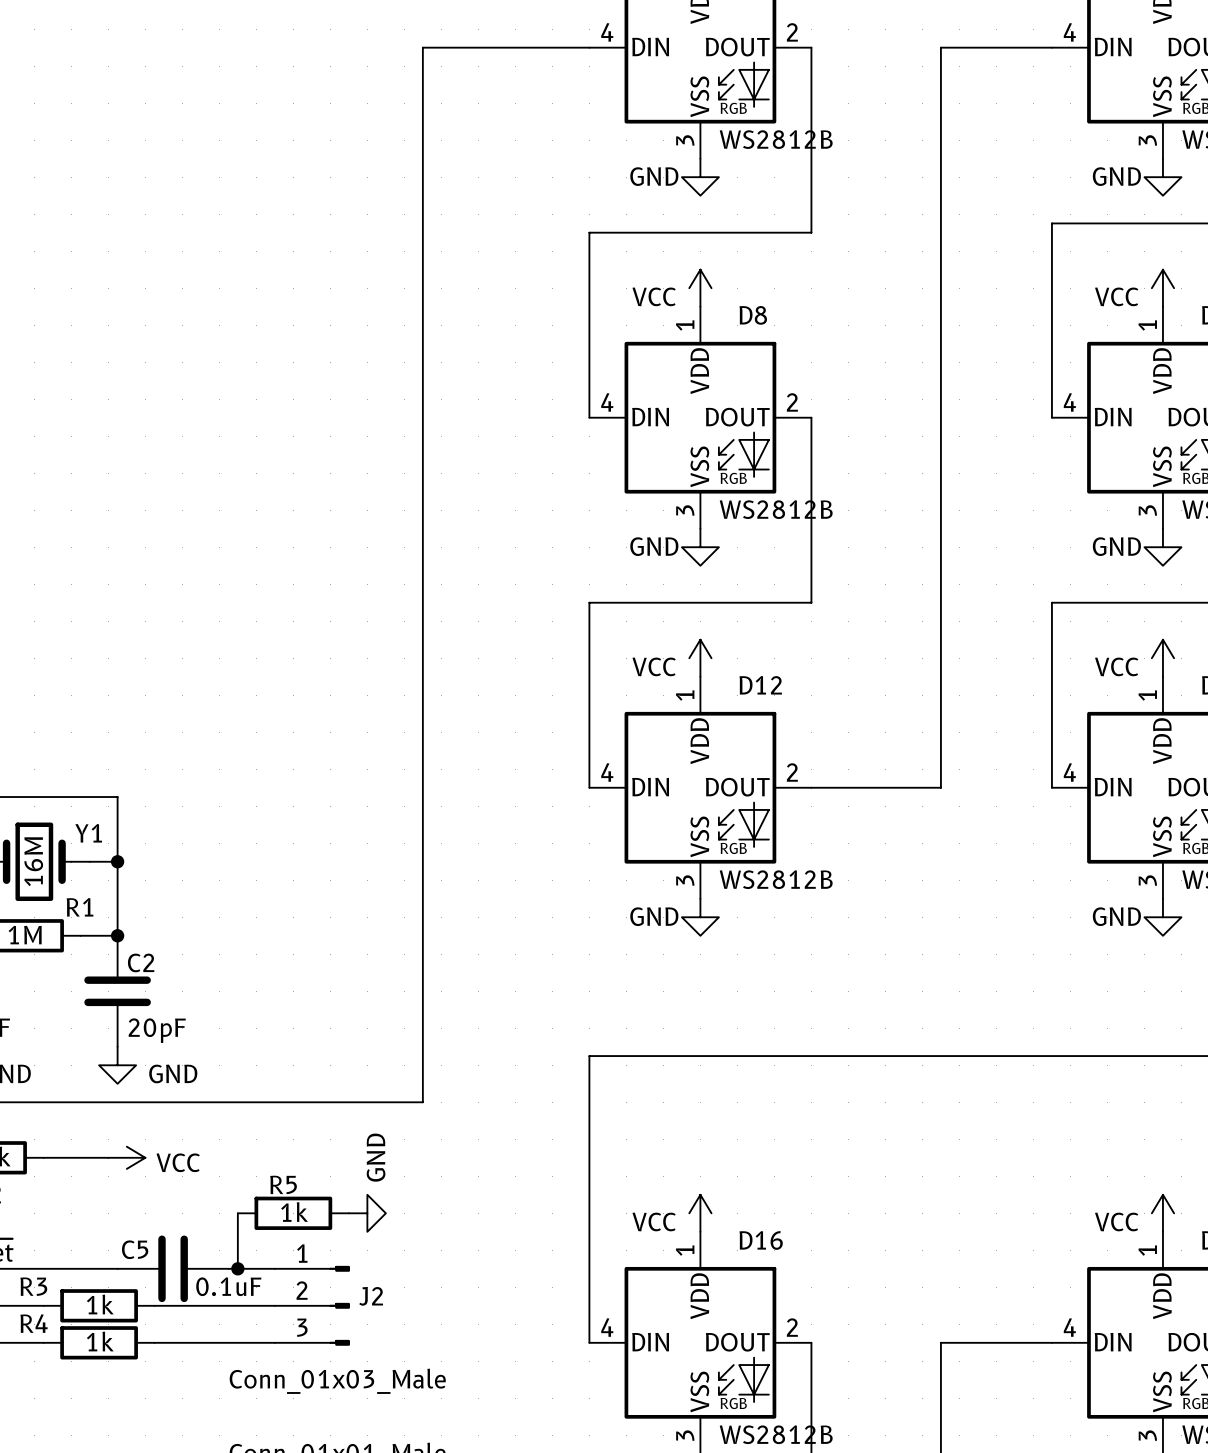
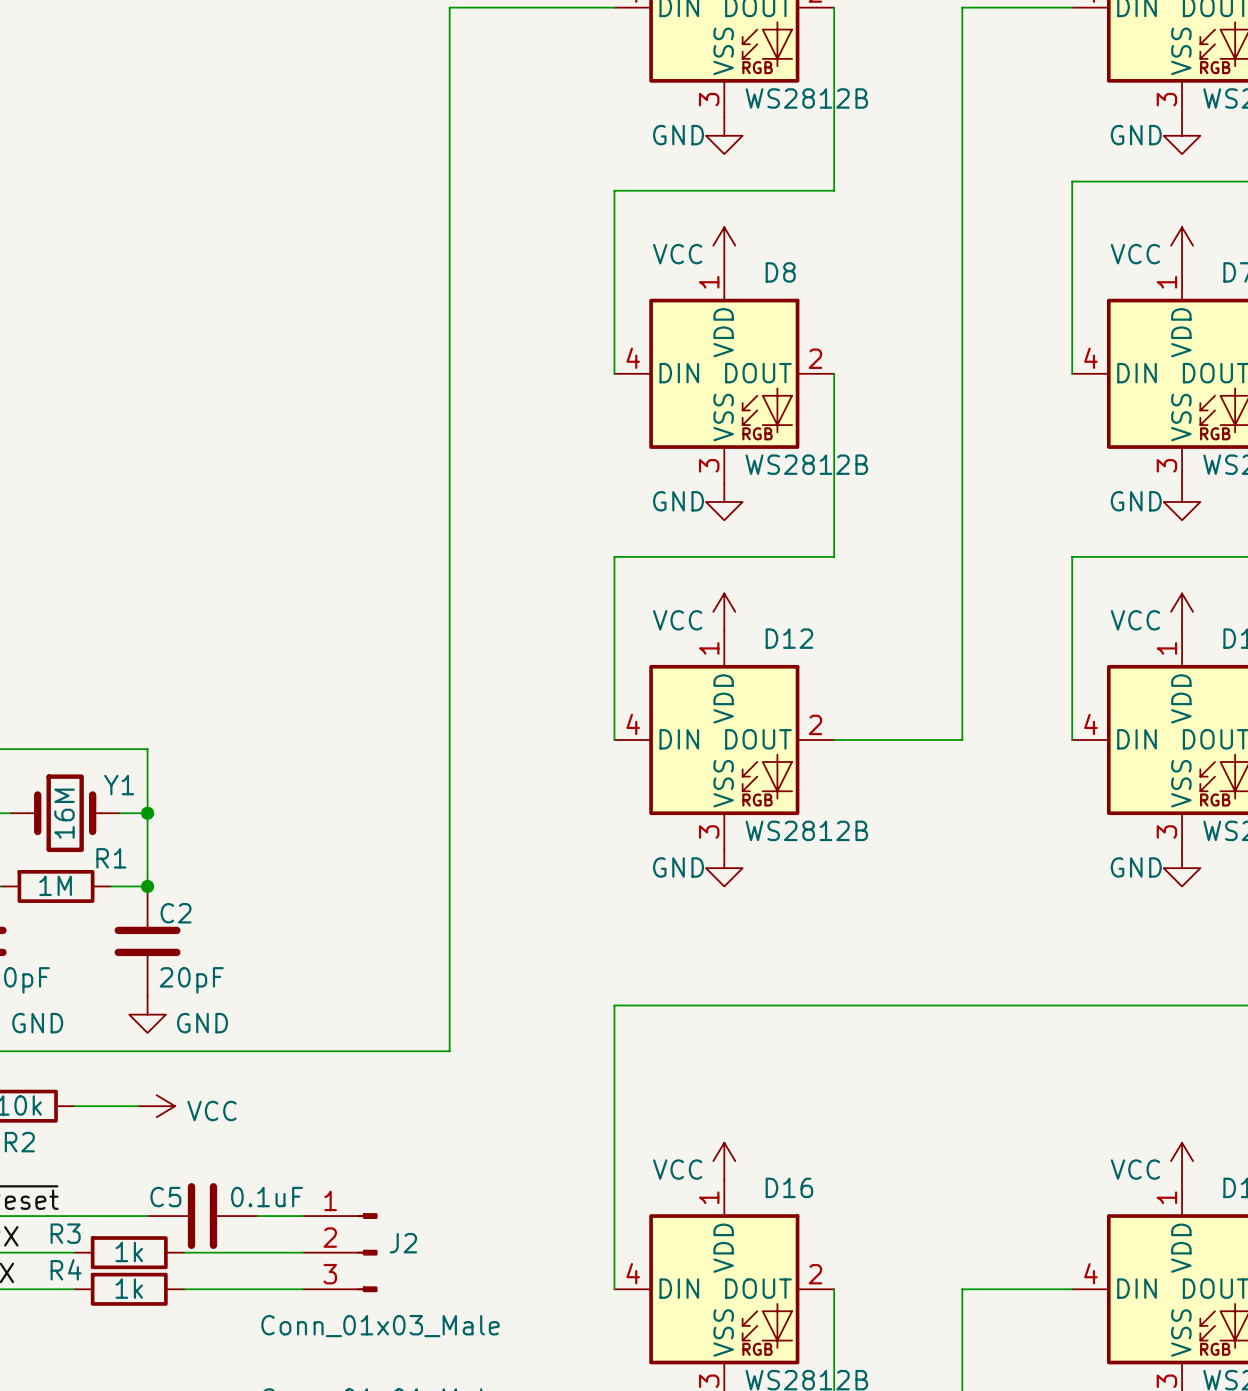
wire: (237, 1213) (237, 1268) -> none
R5: 1k (293, 1213) -> none
power symbol: GND (367, 1213) -> none
junction: (237, 1268) -> none
C5 value position: 0.1uF (228, 1286) -> 0.1uF (267, 1197)

